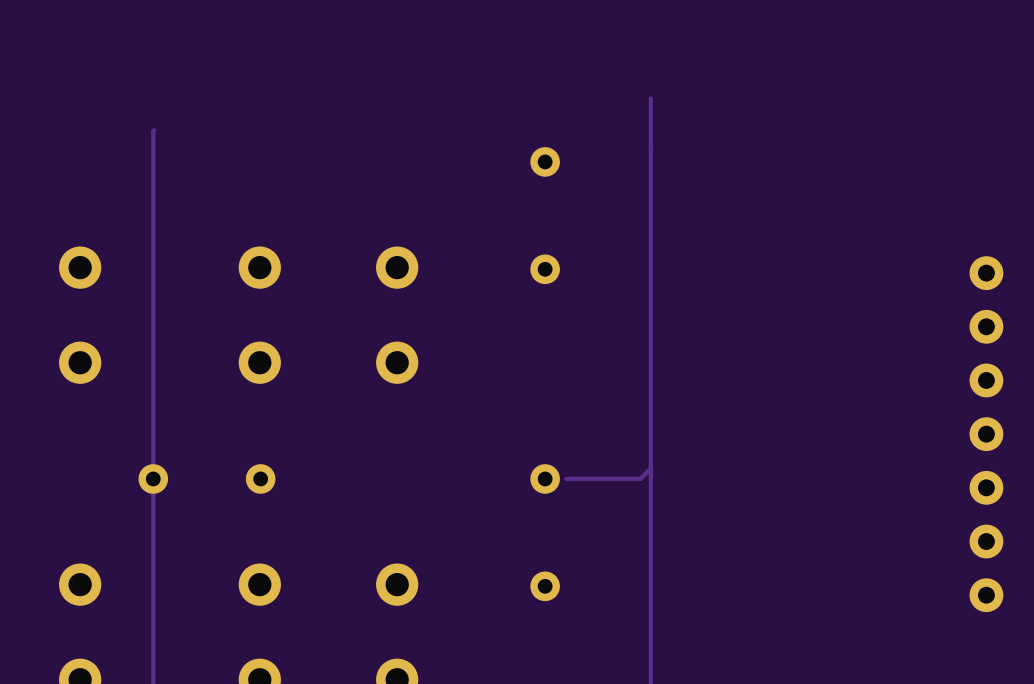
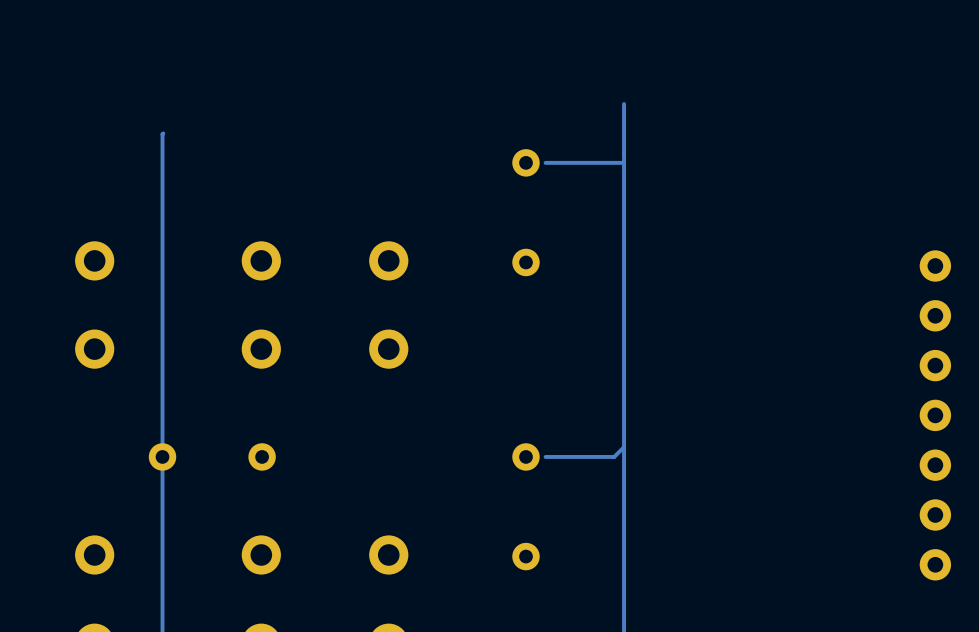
track: none -> (624, 162) (545, 162)

